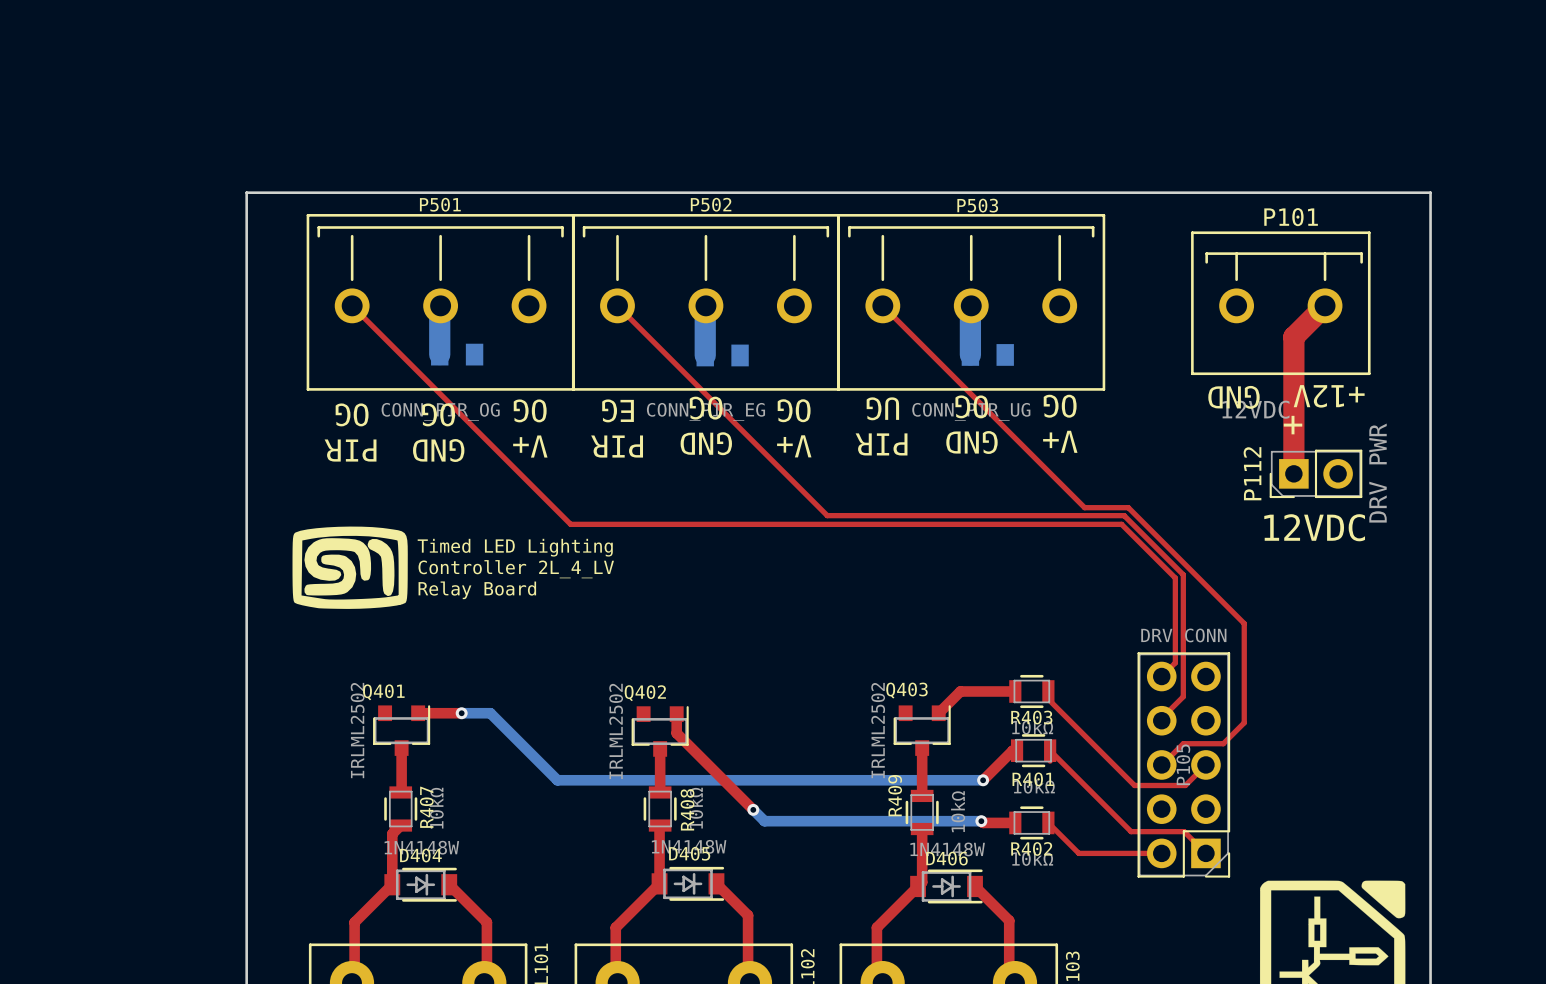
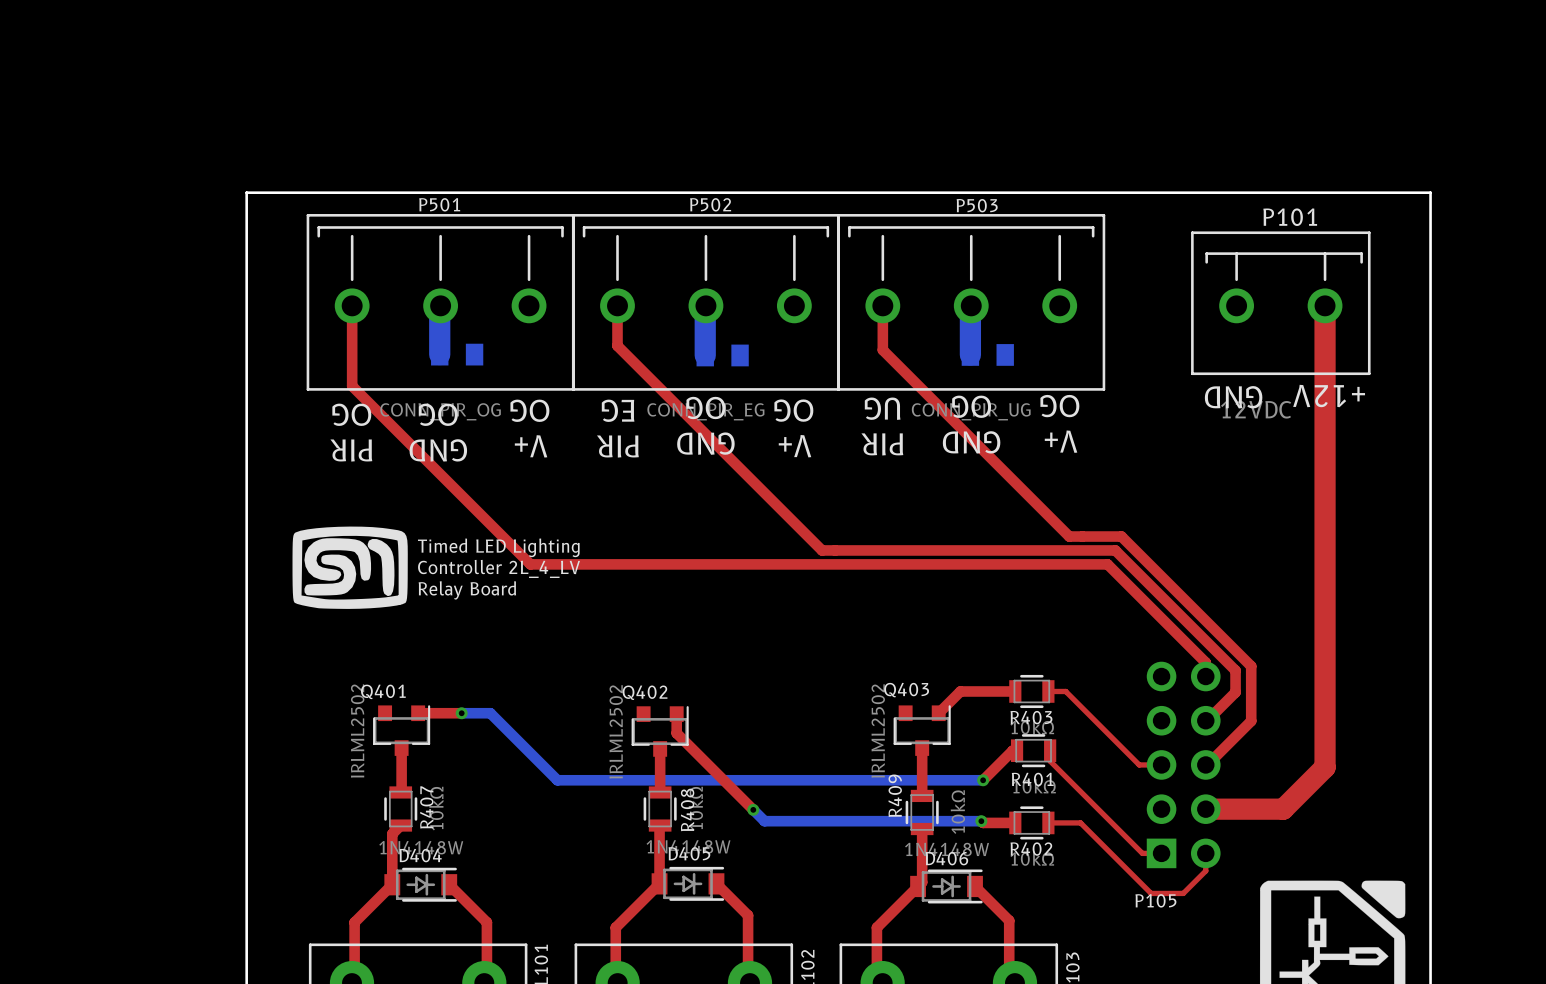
top track: (352, 305) (570, 524) (1121, 524) (1175, 578) (1175, 662) (1161, 676) -> (352, 305) (352, 386) (530, 564) (1107, 564) (1205, 662) (1205, 676)
top track: (617, 305) (827, 515) (1124, 515) (1183, 574) (1183, 696) (1161, 718) (1161, 720) -> (617, 305) (617, 345) (822, 550) (1115, 550) (1235, 670) (1235, 692) (1207, 720)
top track: (882, 305) (1084, 507) (1128, 507) (1244, 623) (1244, 722) (1223, 743) (1183, 743) (1162, 764) -> (882, 305) (882, 350) (1069, 536) (1121, 536) (1251, 666) (1251, 721) (1207, 764)
top track: (1325, 305) (1293, 337) (1293, 473) -> (1325, 305) (1325, 767) (1283, 809) (1205, 809)
text: + (1293, 425) -> none
P112: DRV PWR (1315, 473) -> none
text: 12VDC (1314, 527) -> none
top track: (1048, 691) (1048, 699) (1134, 785) (1185, 785) (1205, 764) -> (1048, 691) (1065, 691) (1139, 764) (1161, 764)
top track: (1050, 750) (1131, 831) (1184, 831) (1205, 853) -> (1048, 822) (1080, 822) (1151, 893) (1183, 893) (1205, 870) (1205, 853)
P105 side: top (1183, 764) -> bottom (1183, 764)
top track: (1048, 822) (1078, 853) (1142, 853) -> (1050, 761) (1142, 853)

